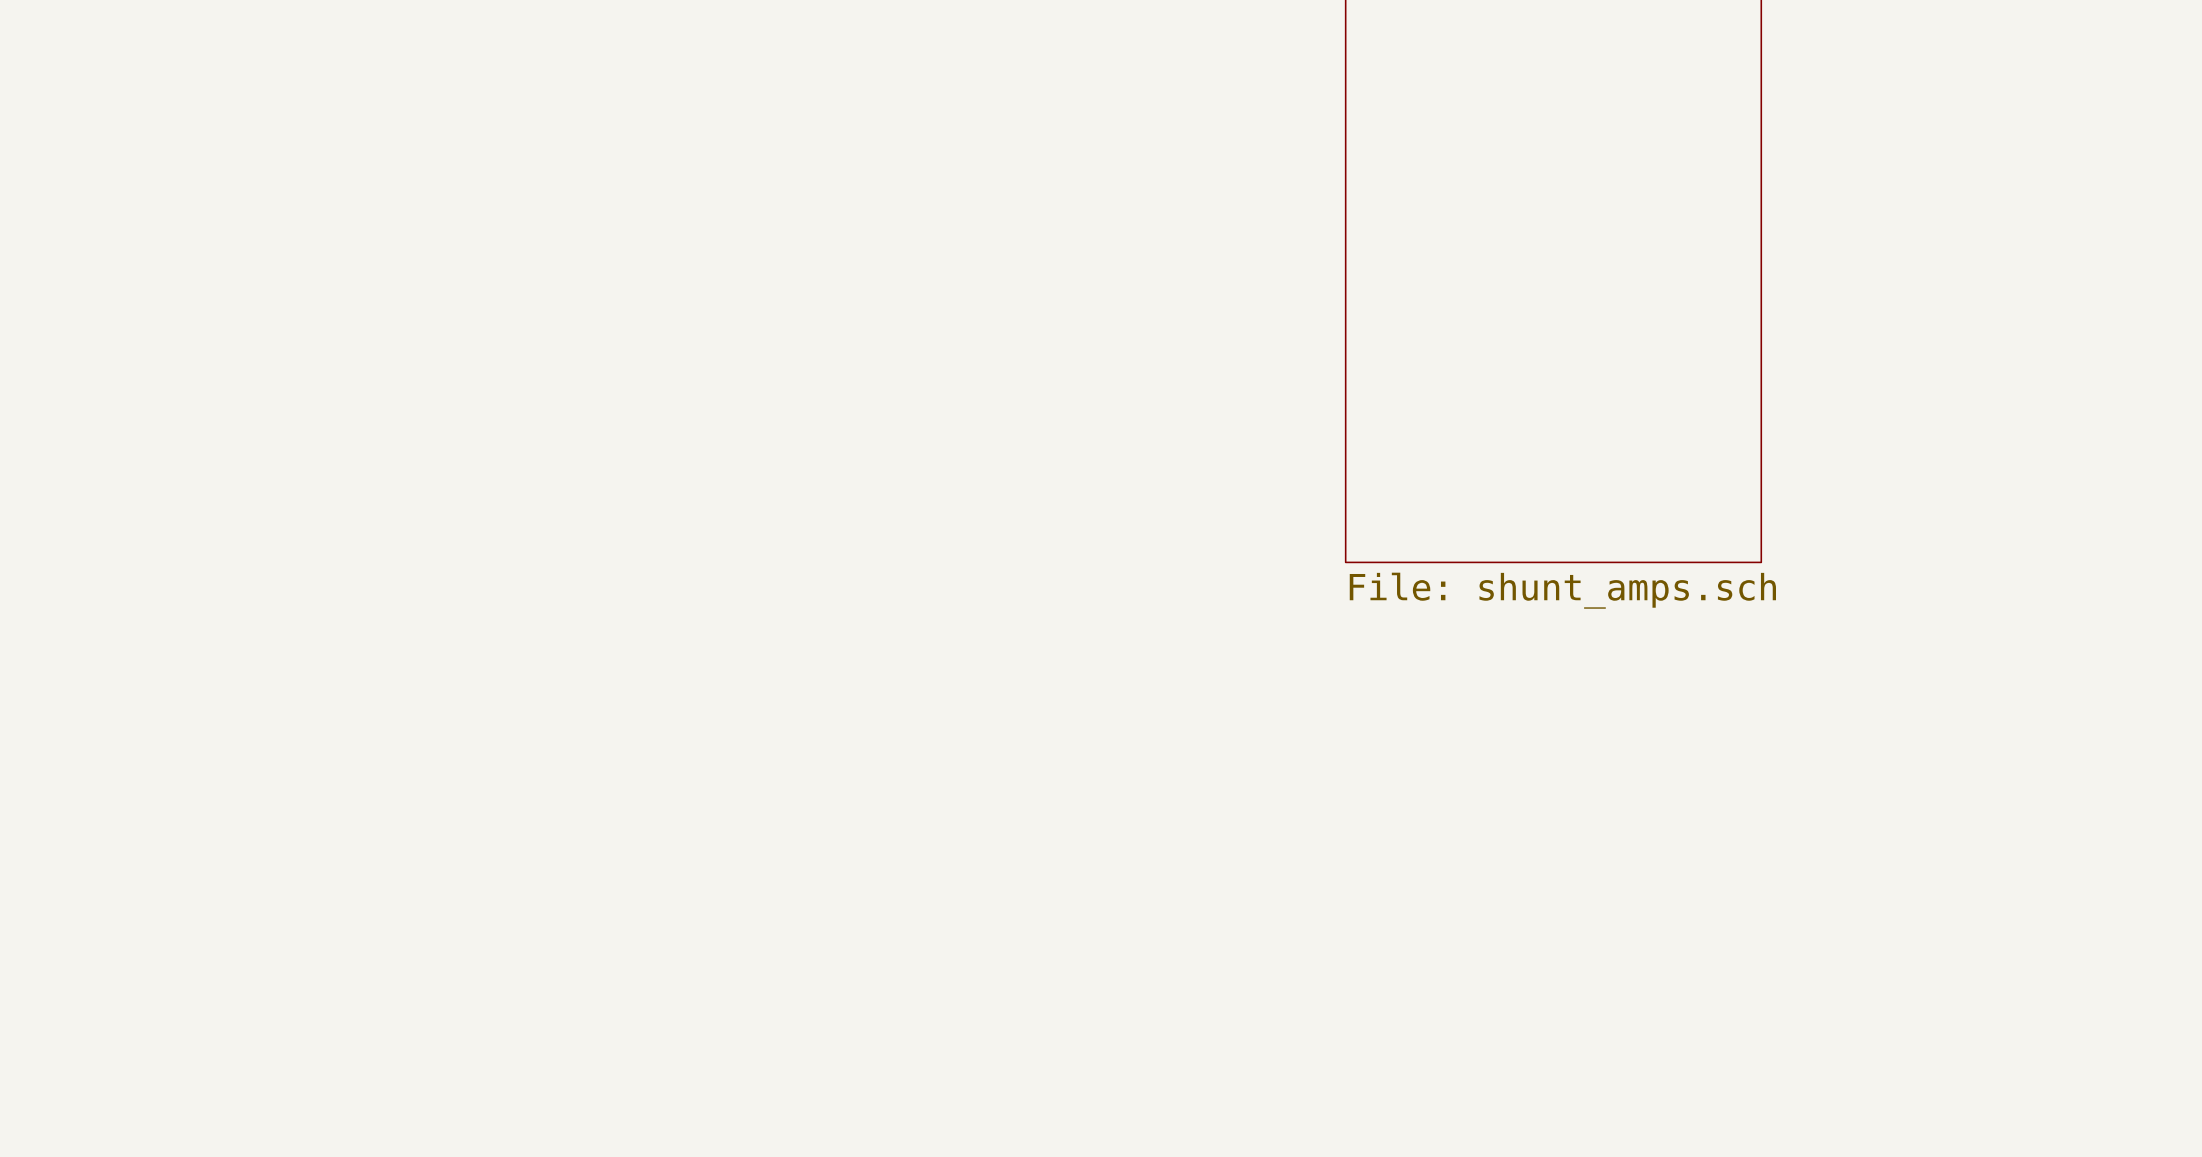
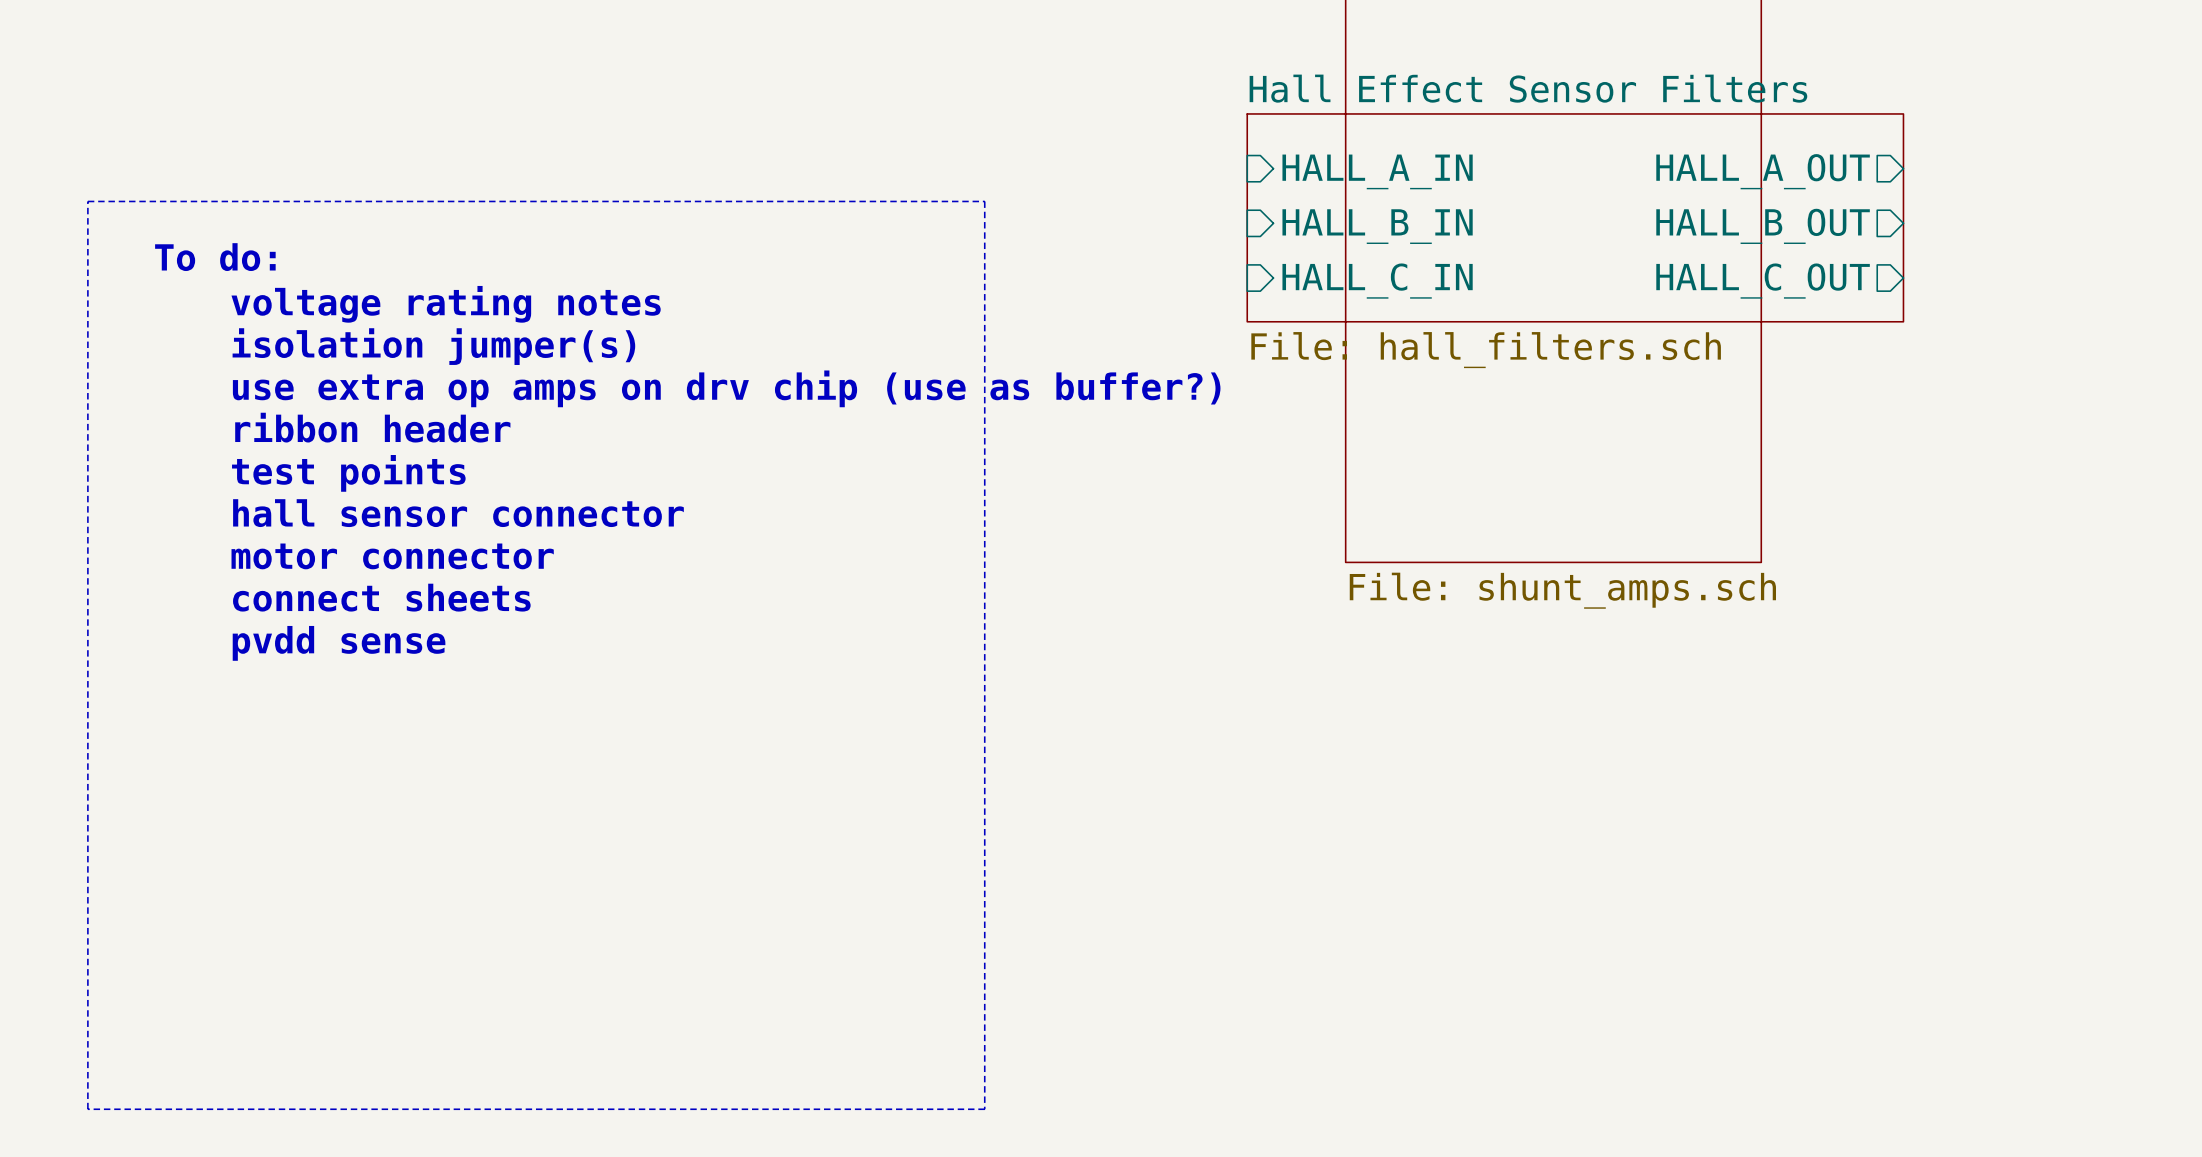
sheet pin: none -> HALL_A_IN (1377, 171)
sheet pin: none -> HALL_A_OUT (1763, 171)
line: none -> (87, 201) (984, 201) (984, 1109) (87, 1109) (87, 201)
sheet Hall Effect Sensor Filters: none -> File: hall_filters.sch (1575, 217)
sheet pin: none -> HALL_B_IN (1377, 226)
sheet pin: none -> HALL_B_OUT (1763, 226)
text: none -> To do: (215, 257)
sheet pin: none -> HALL_C_IN (1377, 281)
sheet pin: none -> HALL_C_OUT (1763, 281)
text: none -> voltage rating notes (446, 304)
text: none -> isolation jumper(s) (433, 346)
text: none -> use extra op amps on drv chip (use as buffer?) (726, 388)
text: none -> ribbon header (372, 427)
text: none -> test points (348, 473)
text: none -> hall sensor connector (458, 513)
text: none -> motor connector (392, 556)
text: none -> connect sheets (381, 597)
text: none -> pvdd sense (339, 643)

